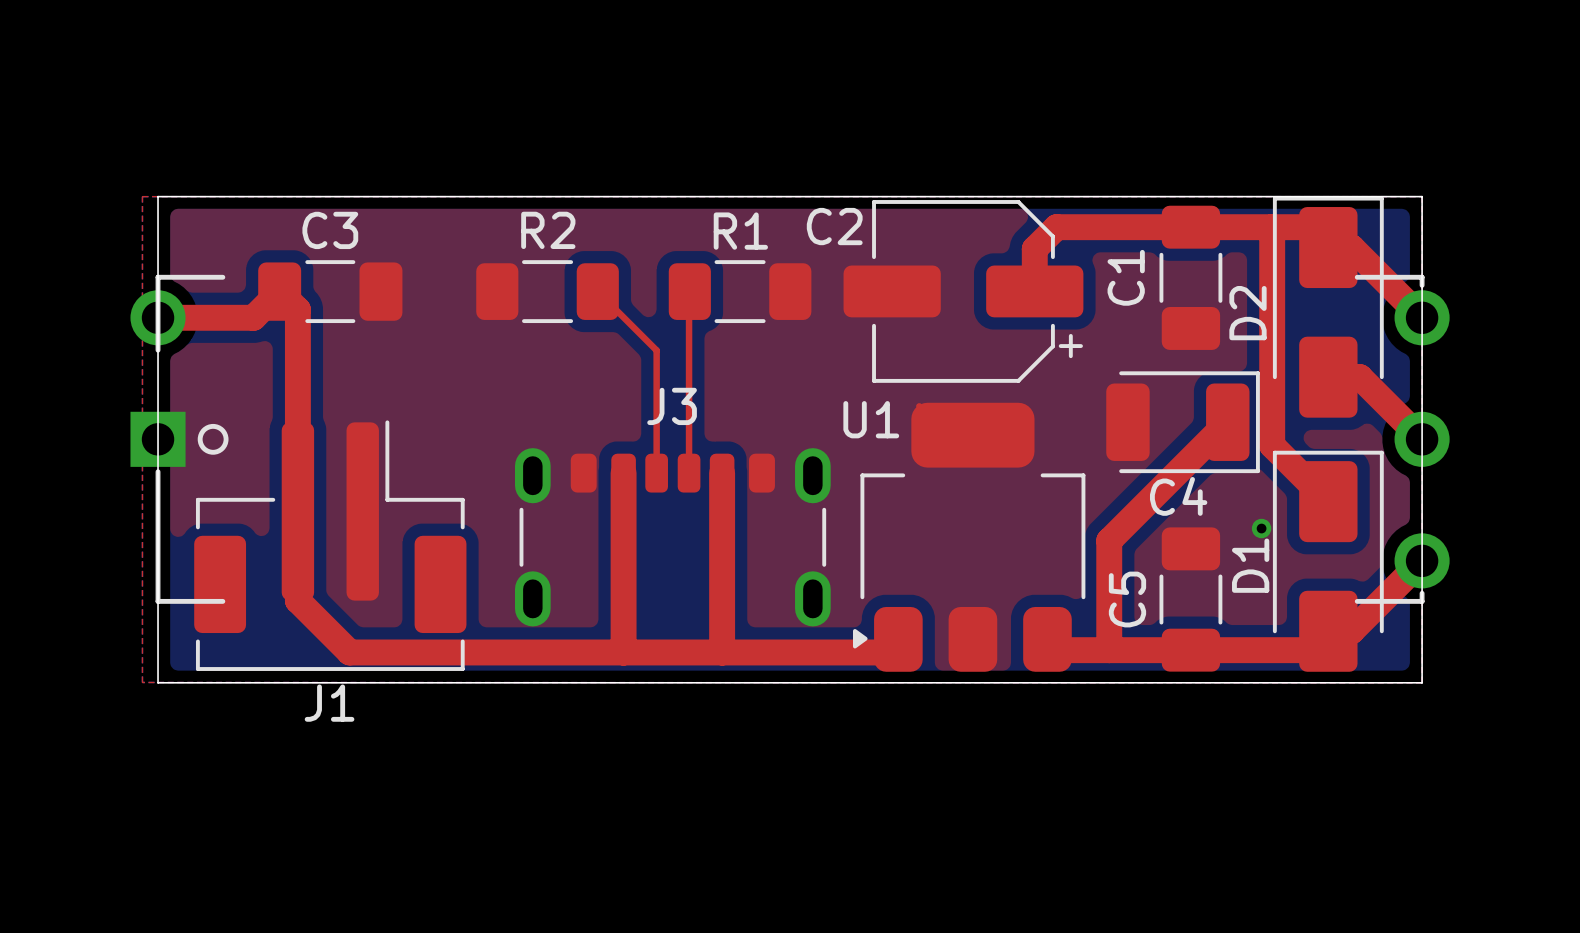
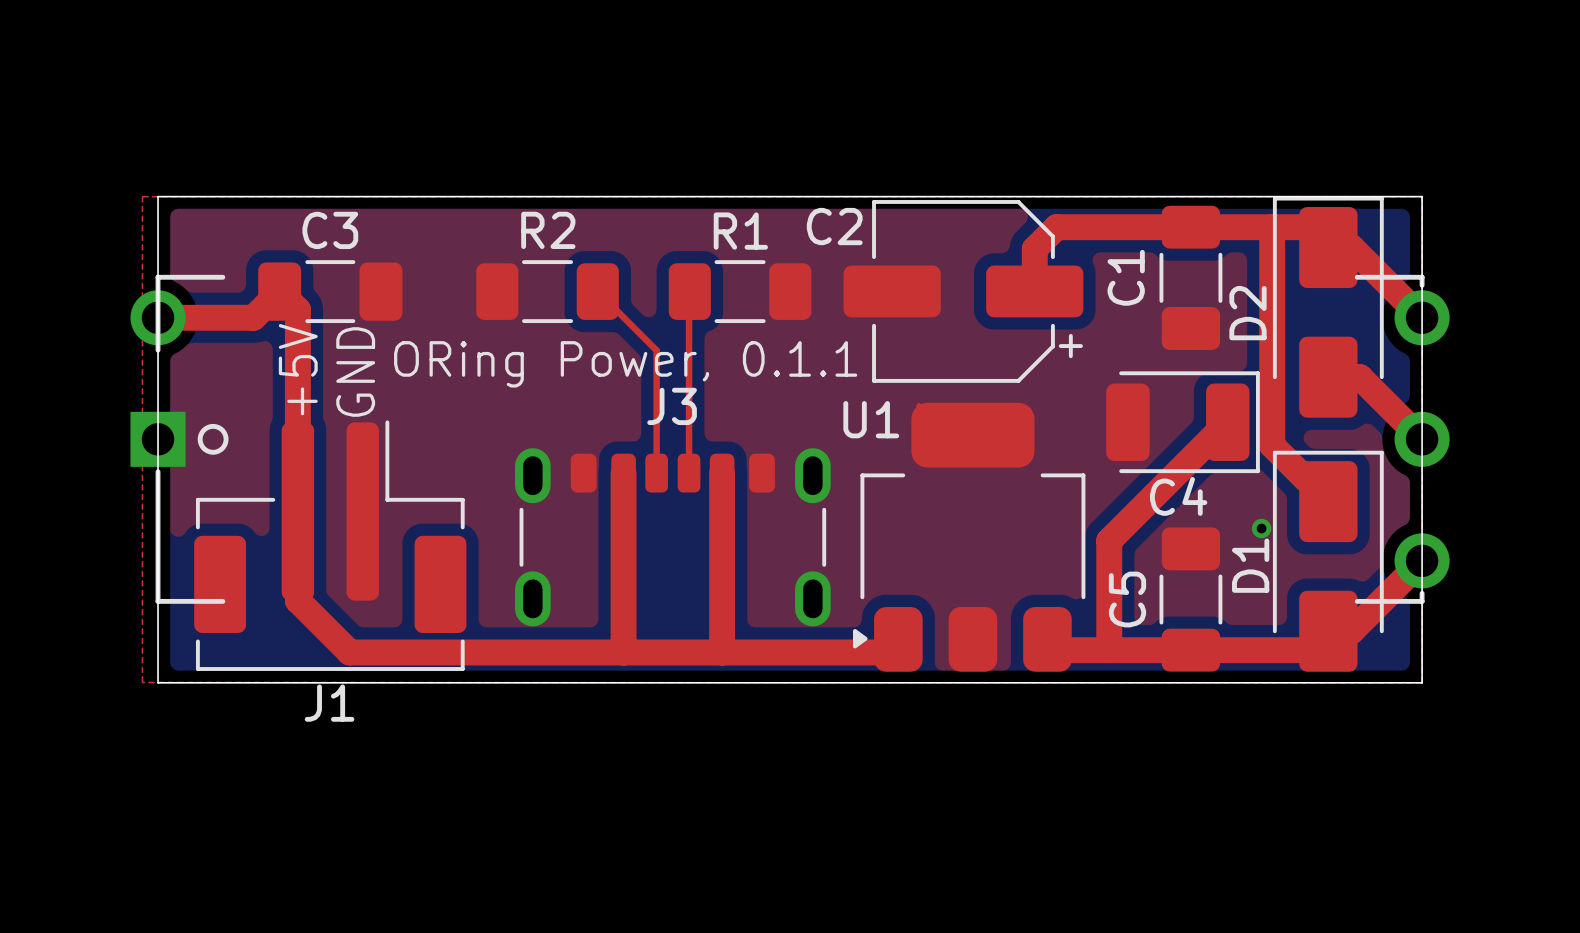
text: none -> ORing Power, 0.1.1 (625, 364)
text: none -> +5V (298, 369)
text: none -> GND (355, 371)

